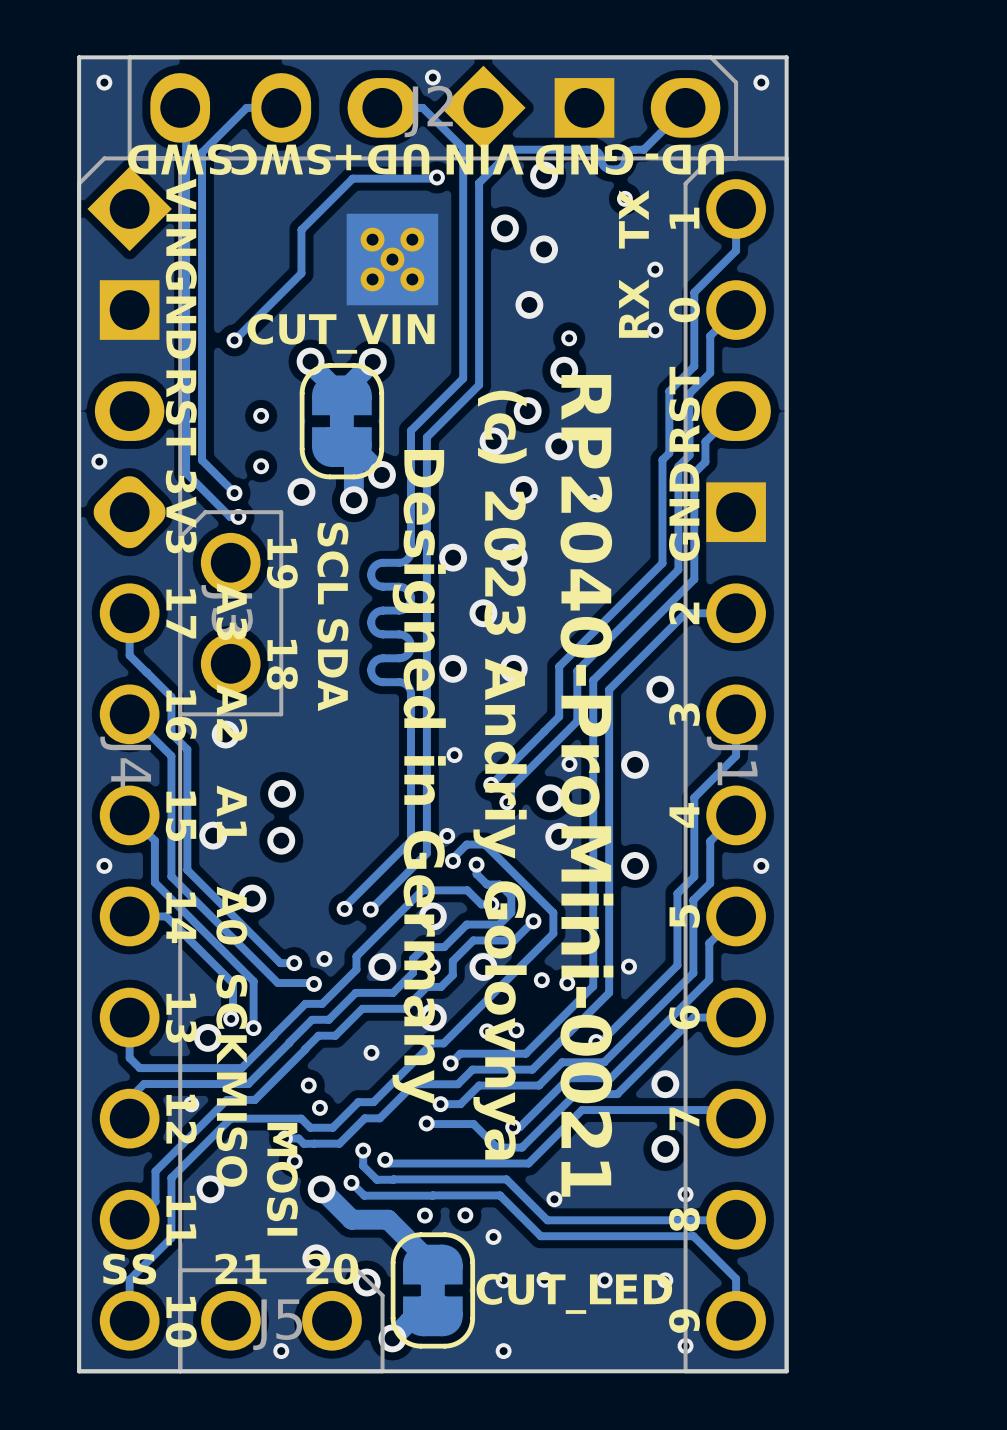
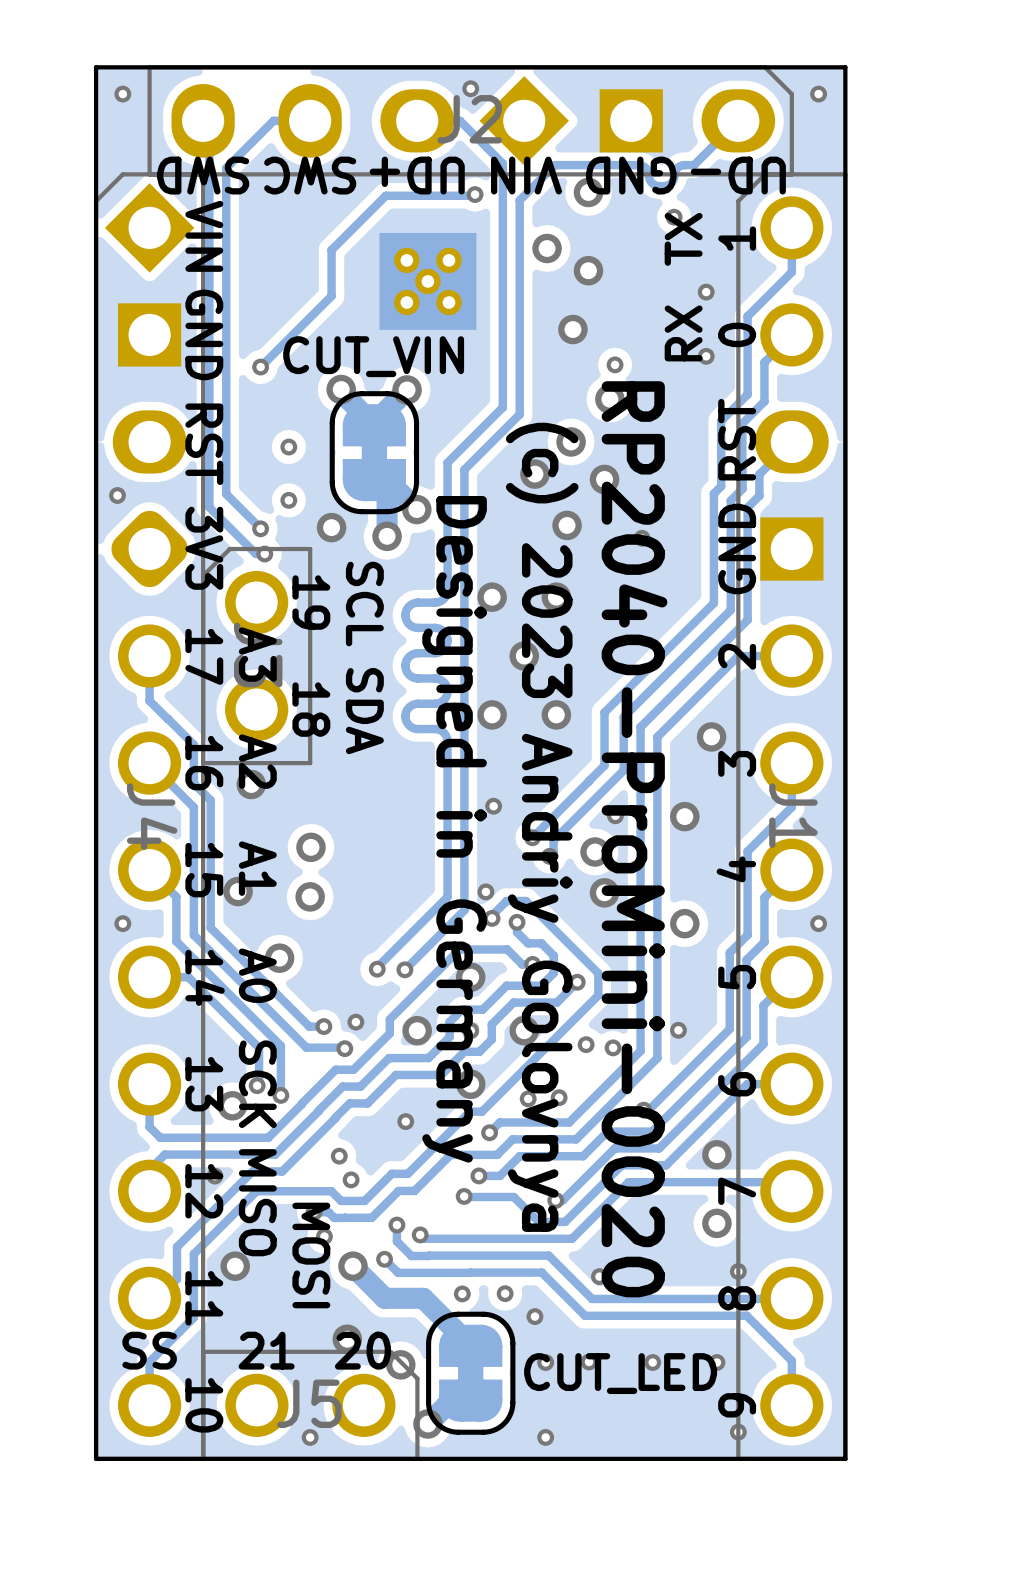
text: RP2040-ProMini-0021 (586, 785) -> RP2040-ProMini-0020 (634, 839)

